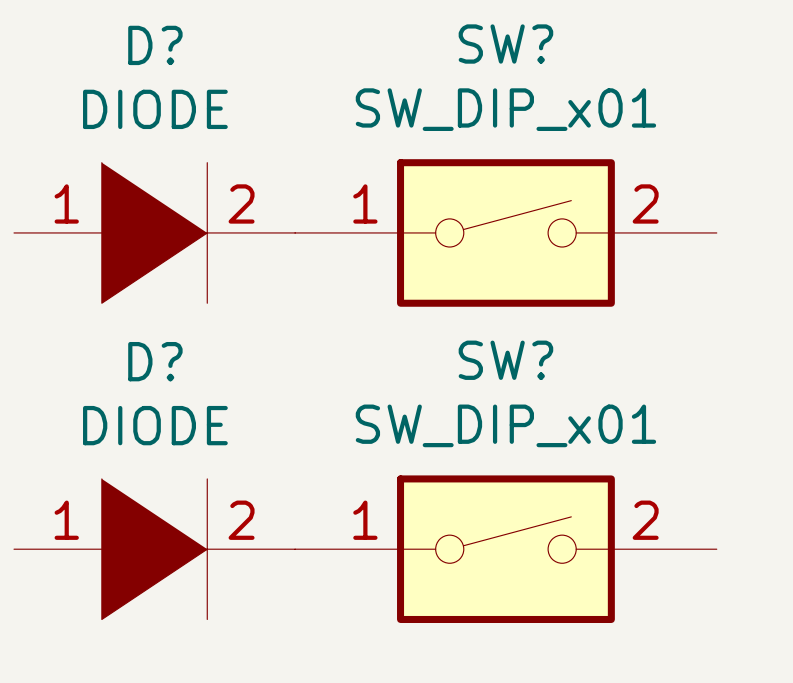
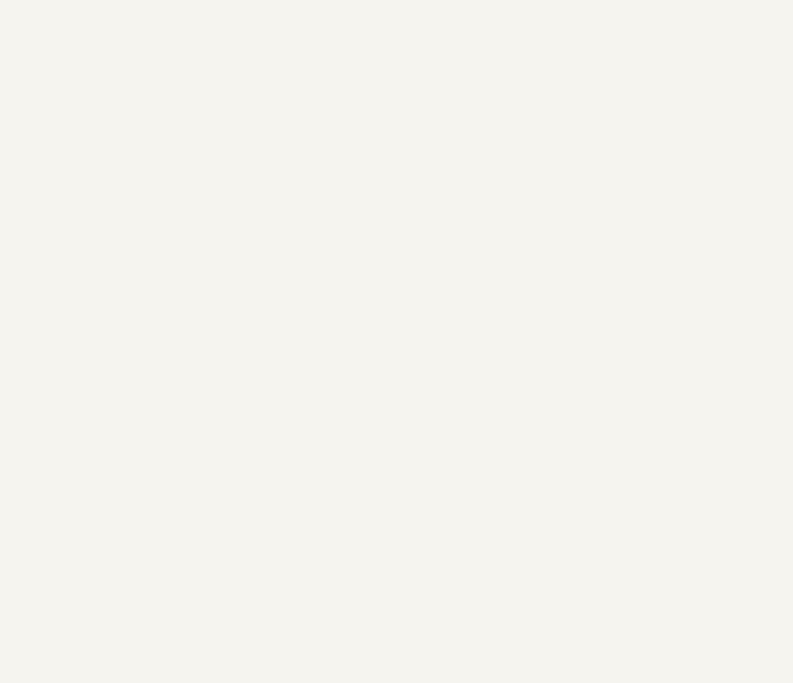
D?: DIODE (154, 232) -> none
SW?: SW_DIP_x01 (505, 232) -> none
D?: DIODE (154, 549) -> none
SW?: SW_DIP_x01 (505, 549) -> none

